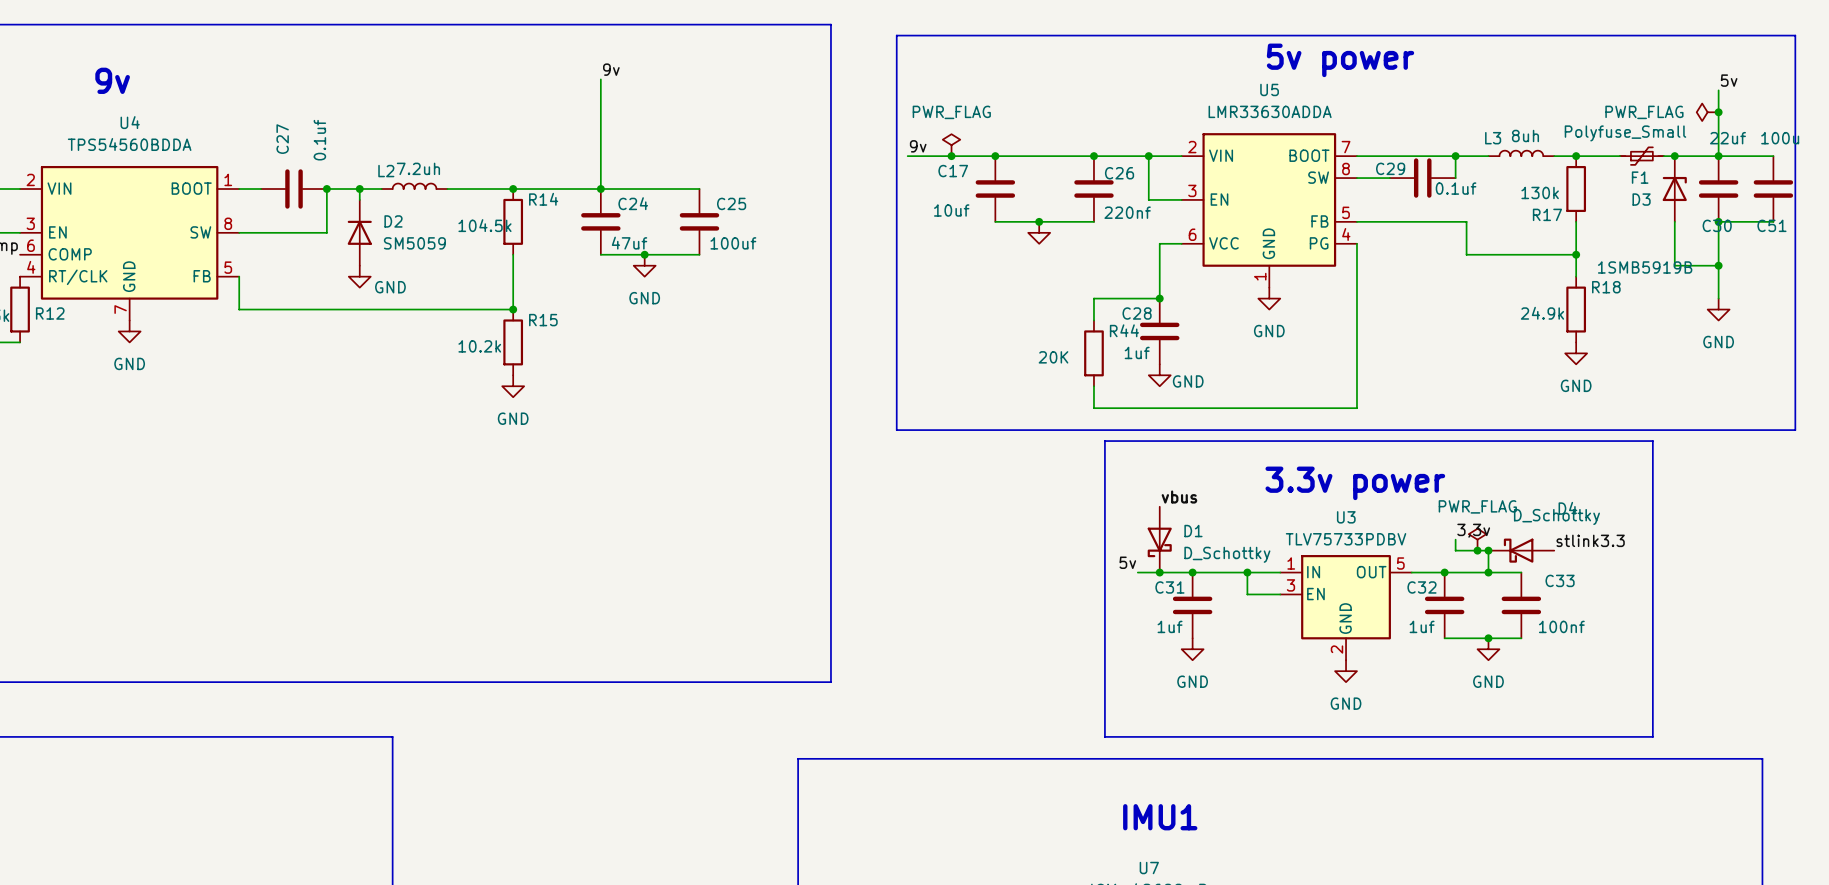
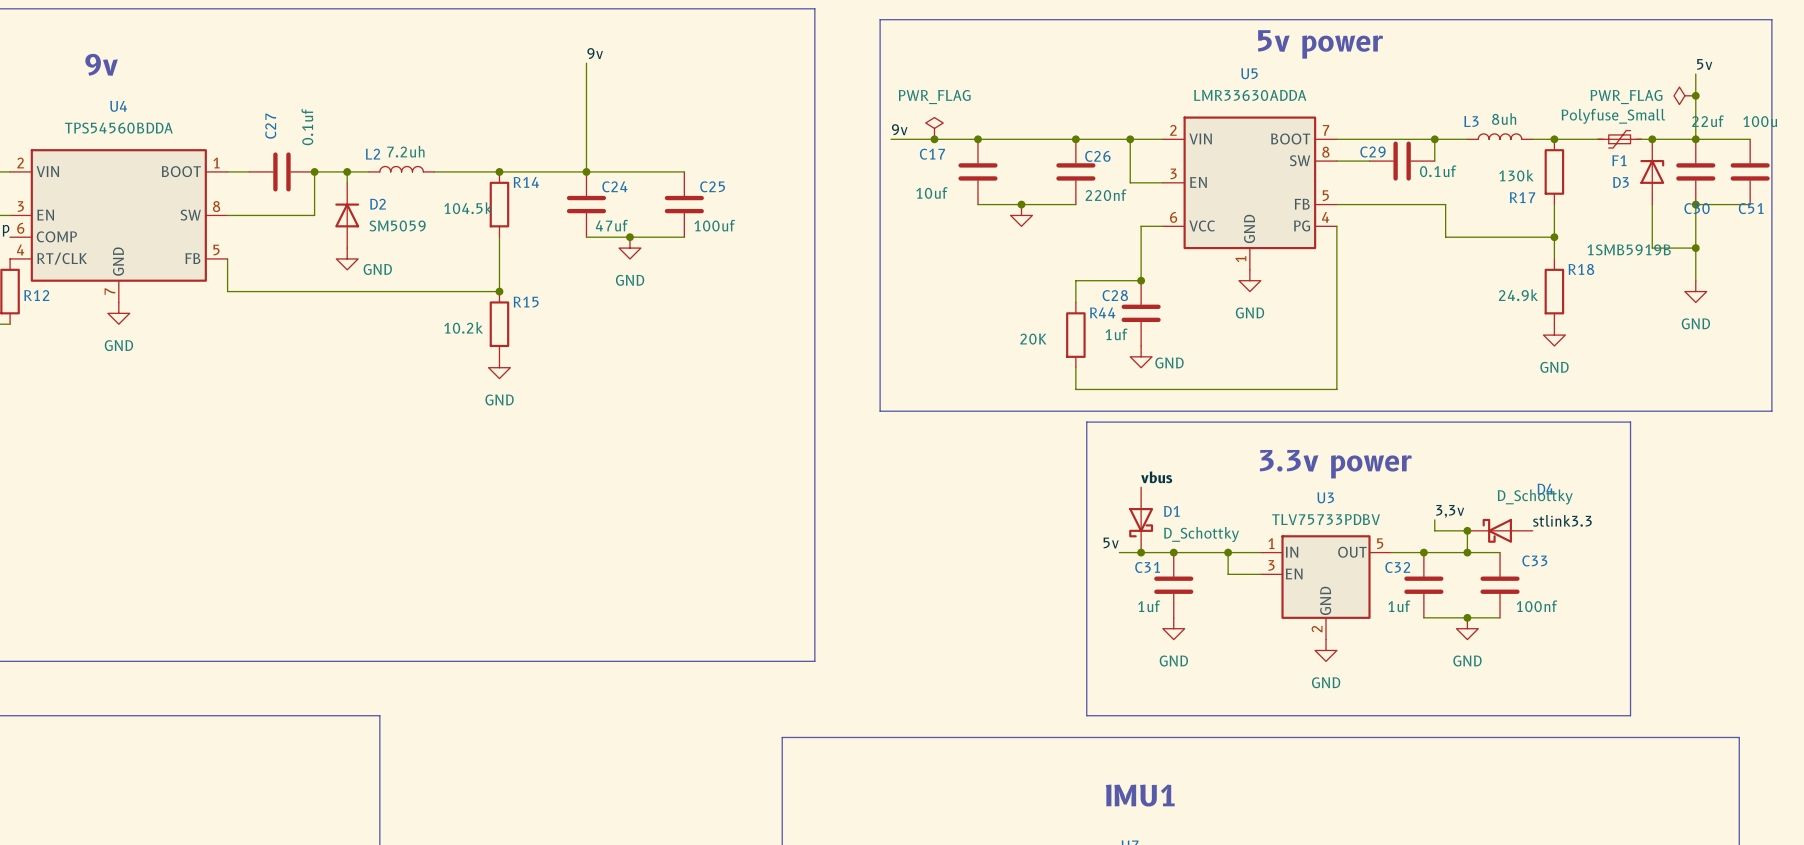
power symbol: PWR_FLAG (1477, 539) -> none
junction: (1477, 550) -> none

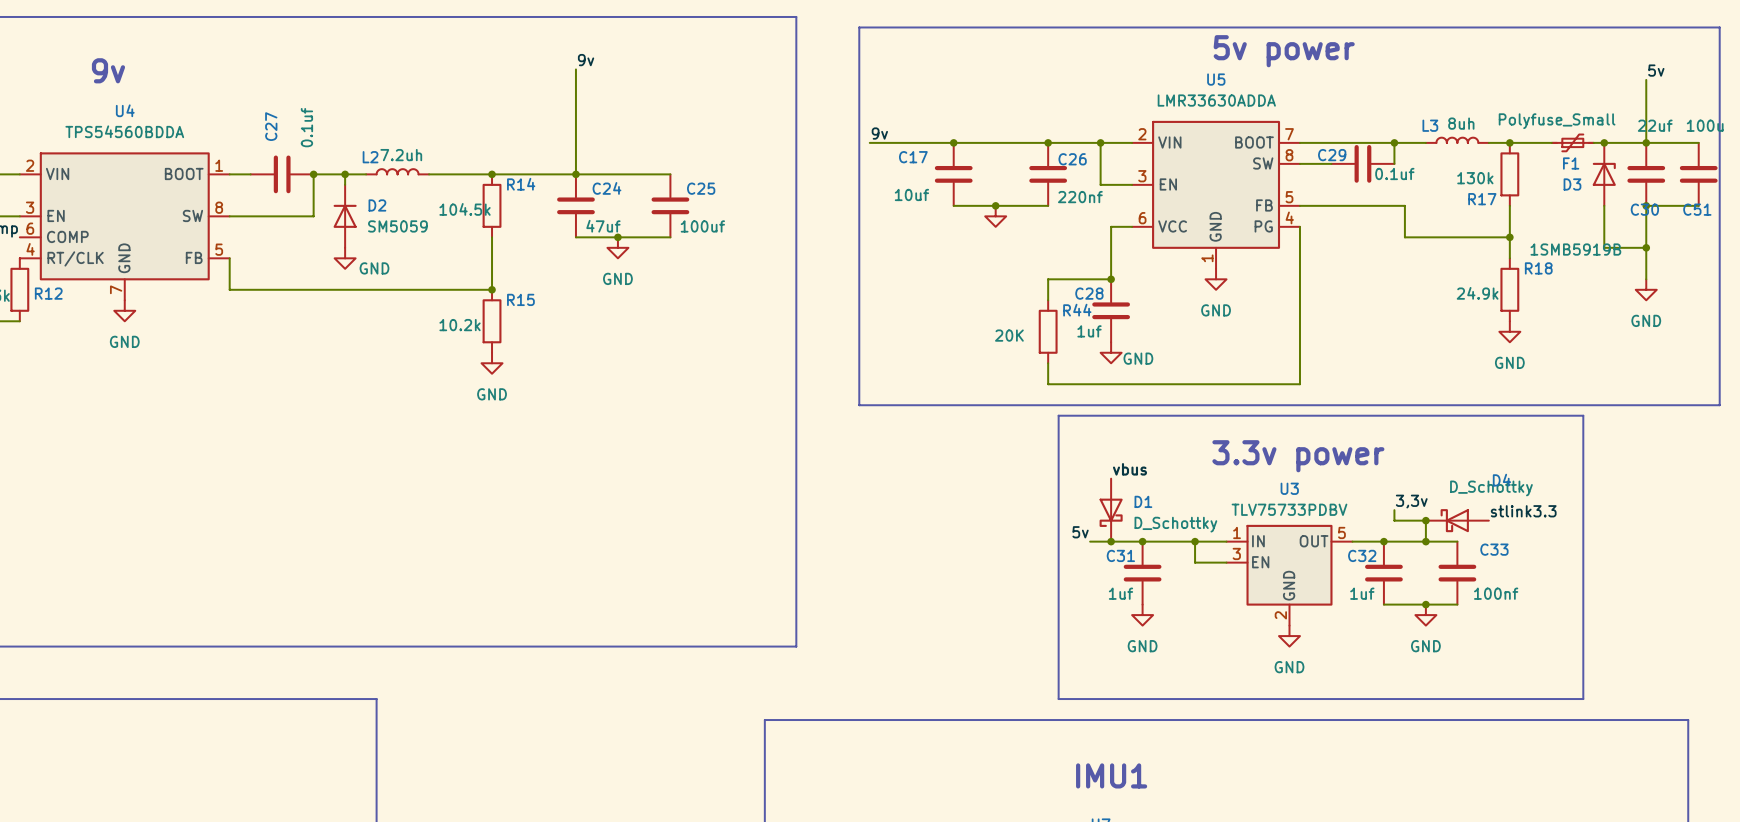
power symbol: PWR_FLAG (1684, 95) -> none
junction: (1695, 95) -> none
power symbol: PWR_FLAG (934, 128) -> none
junction: (934, 139) -> none

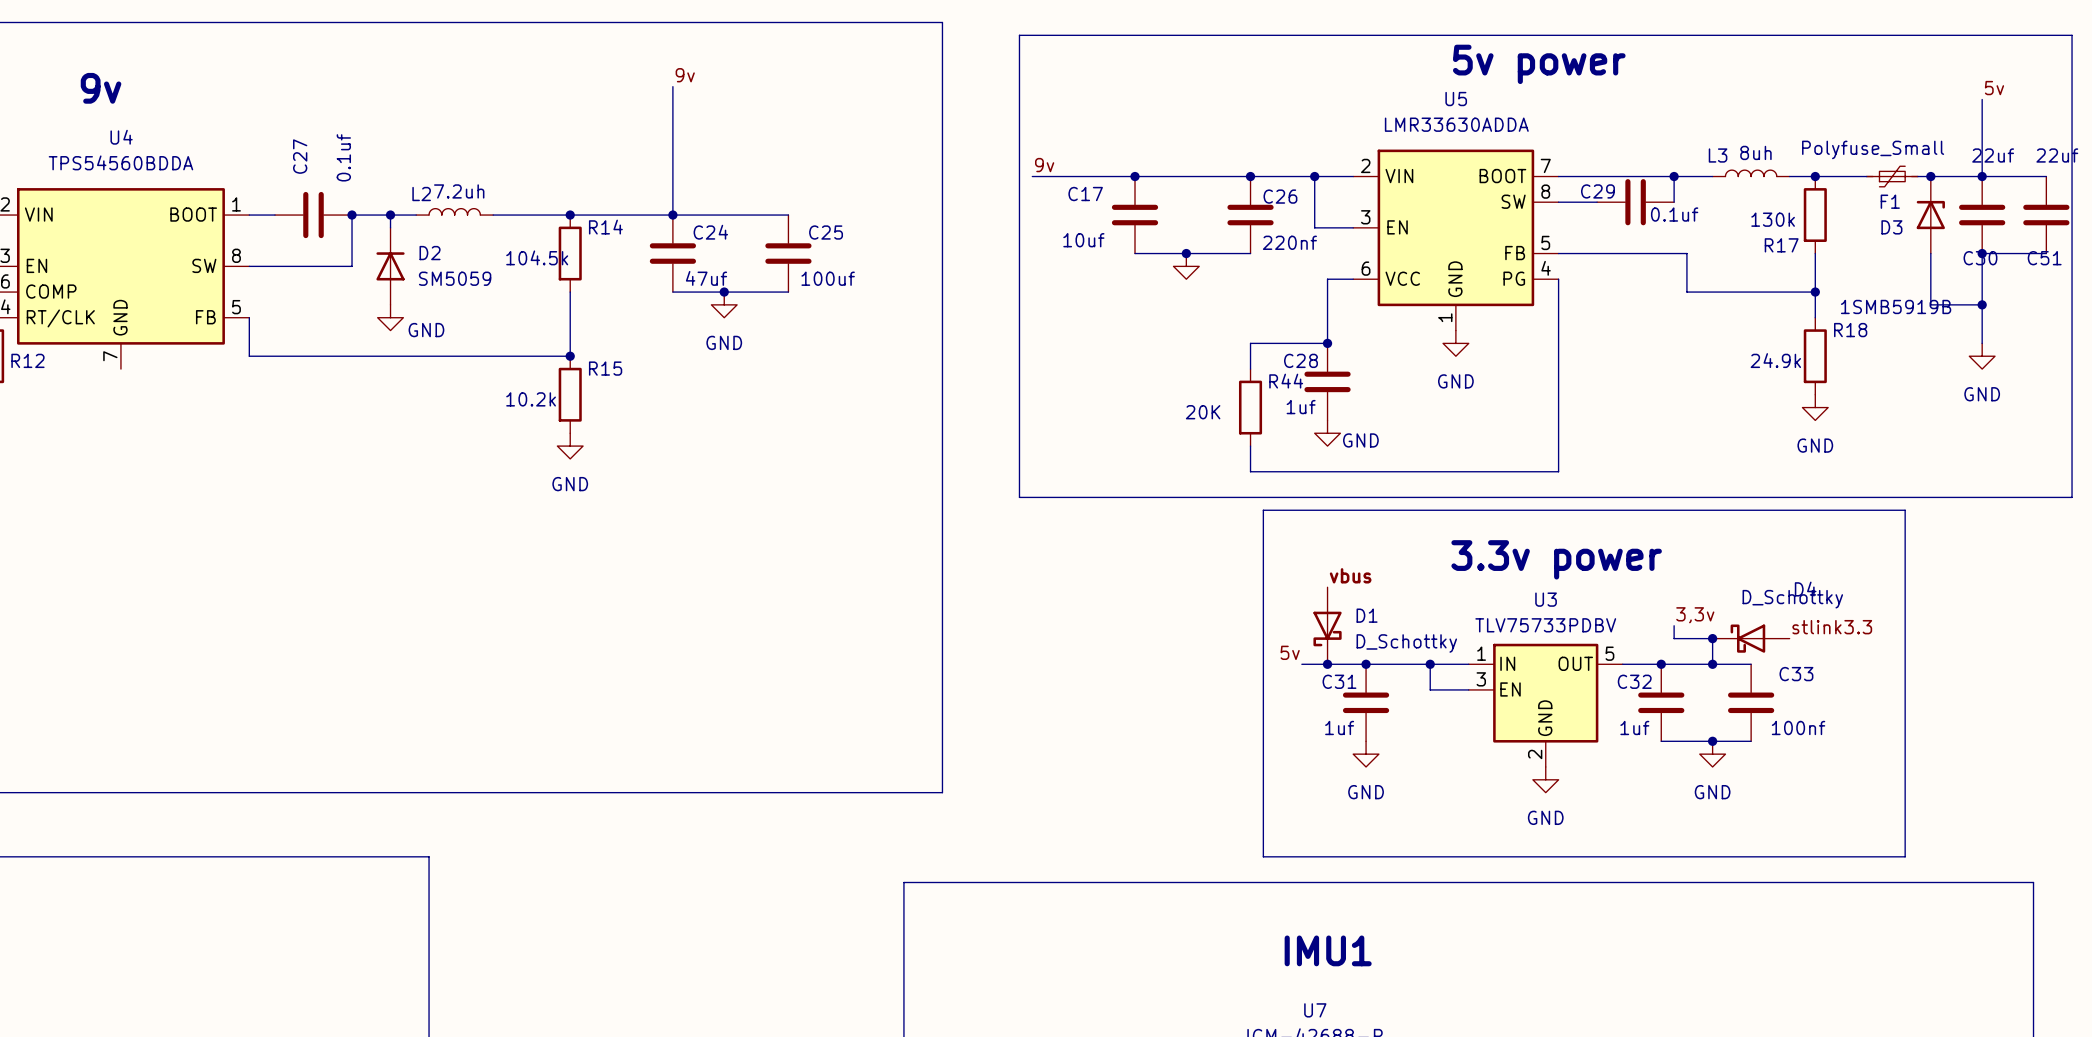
C51 value: 100u (1705, 125) -> 22uf (2057, 155)
power symbol: GND (124, 310) -> none

